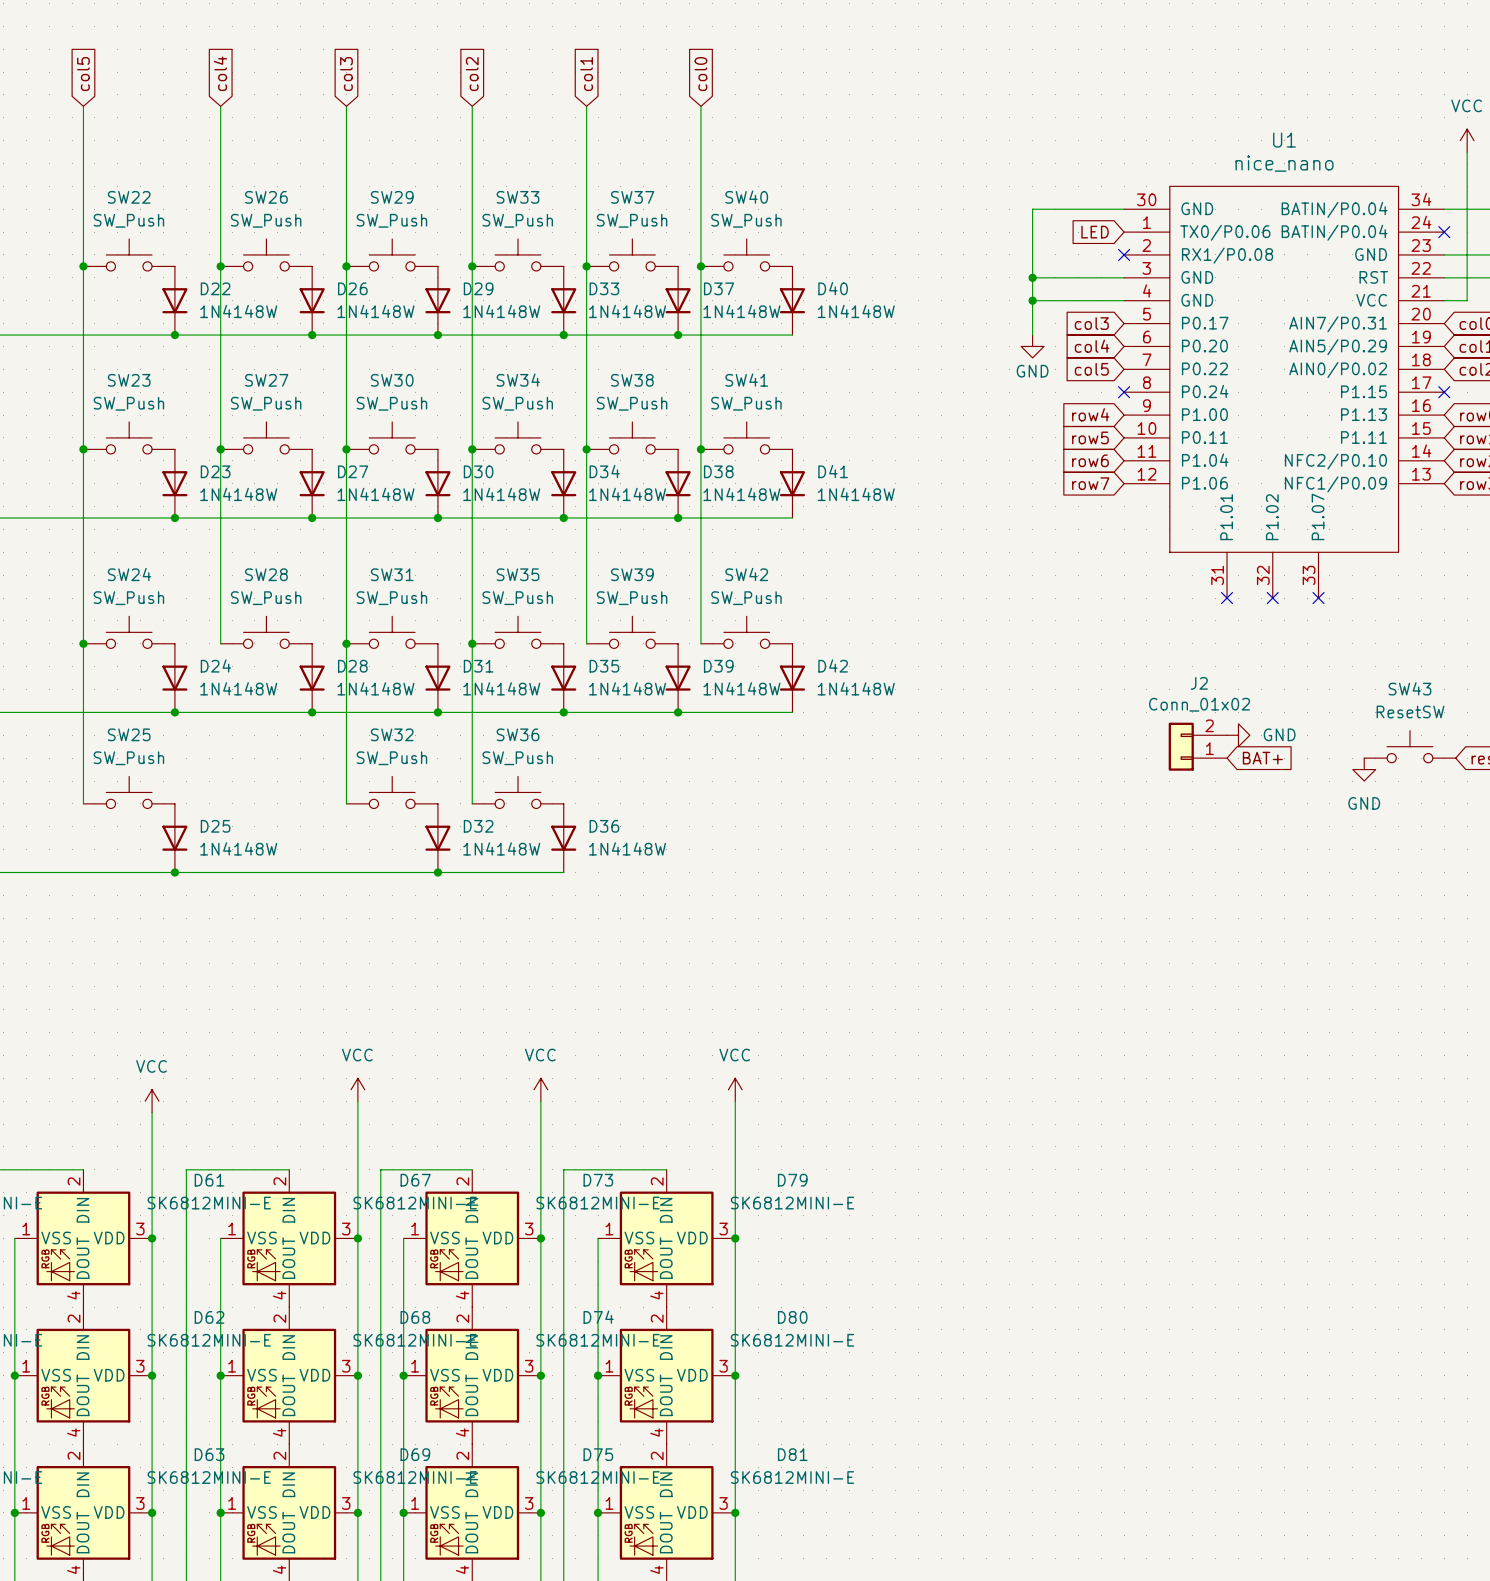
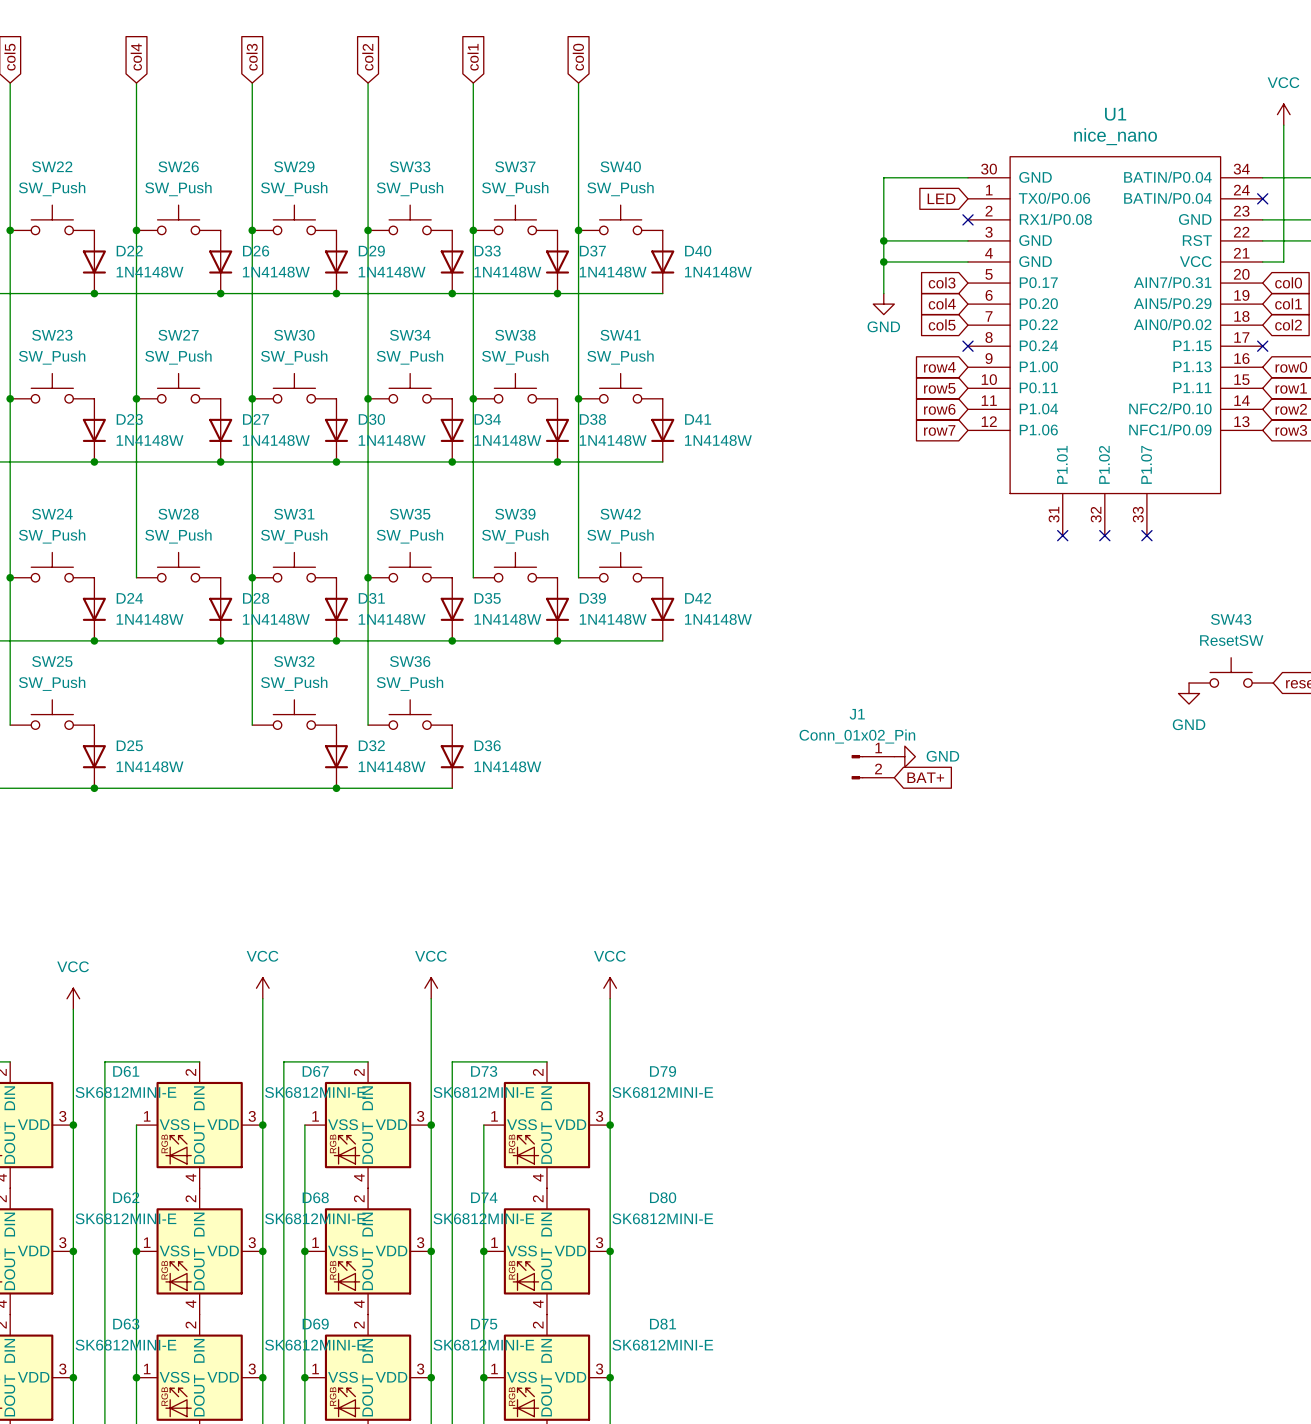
power symbol position: GND (1238, 735) -> GND (904, 756)
J2: Conn_01x02 (1197, 746) -> none
global label position: BAT+ (1262, 758) -> BAT+ (925, 777)
J1: none -> Conn_01x02_Pin (872, 767)

